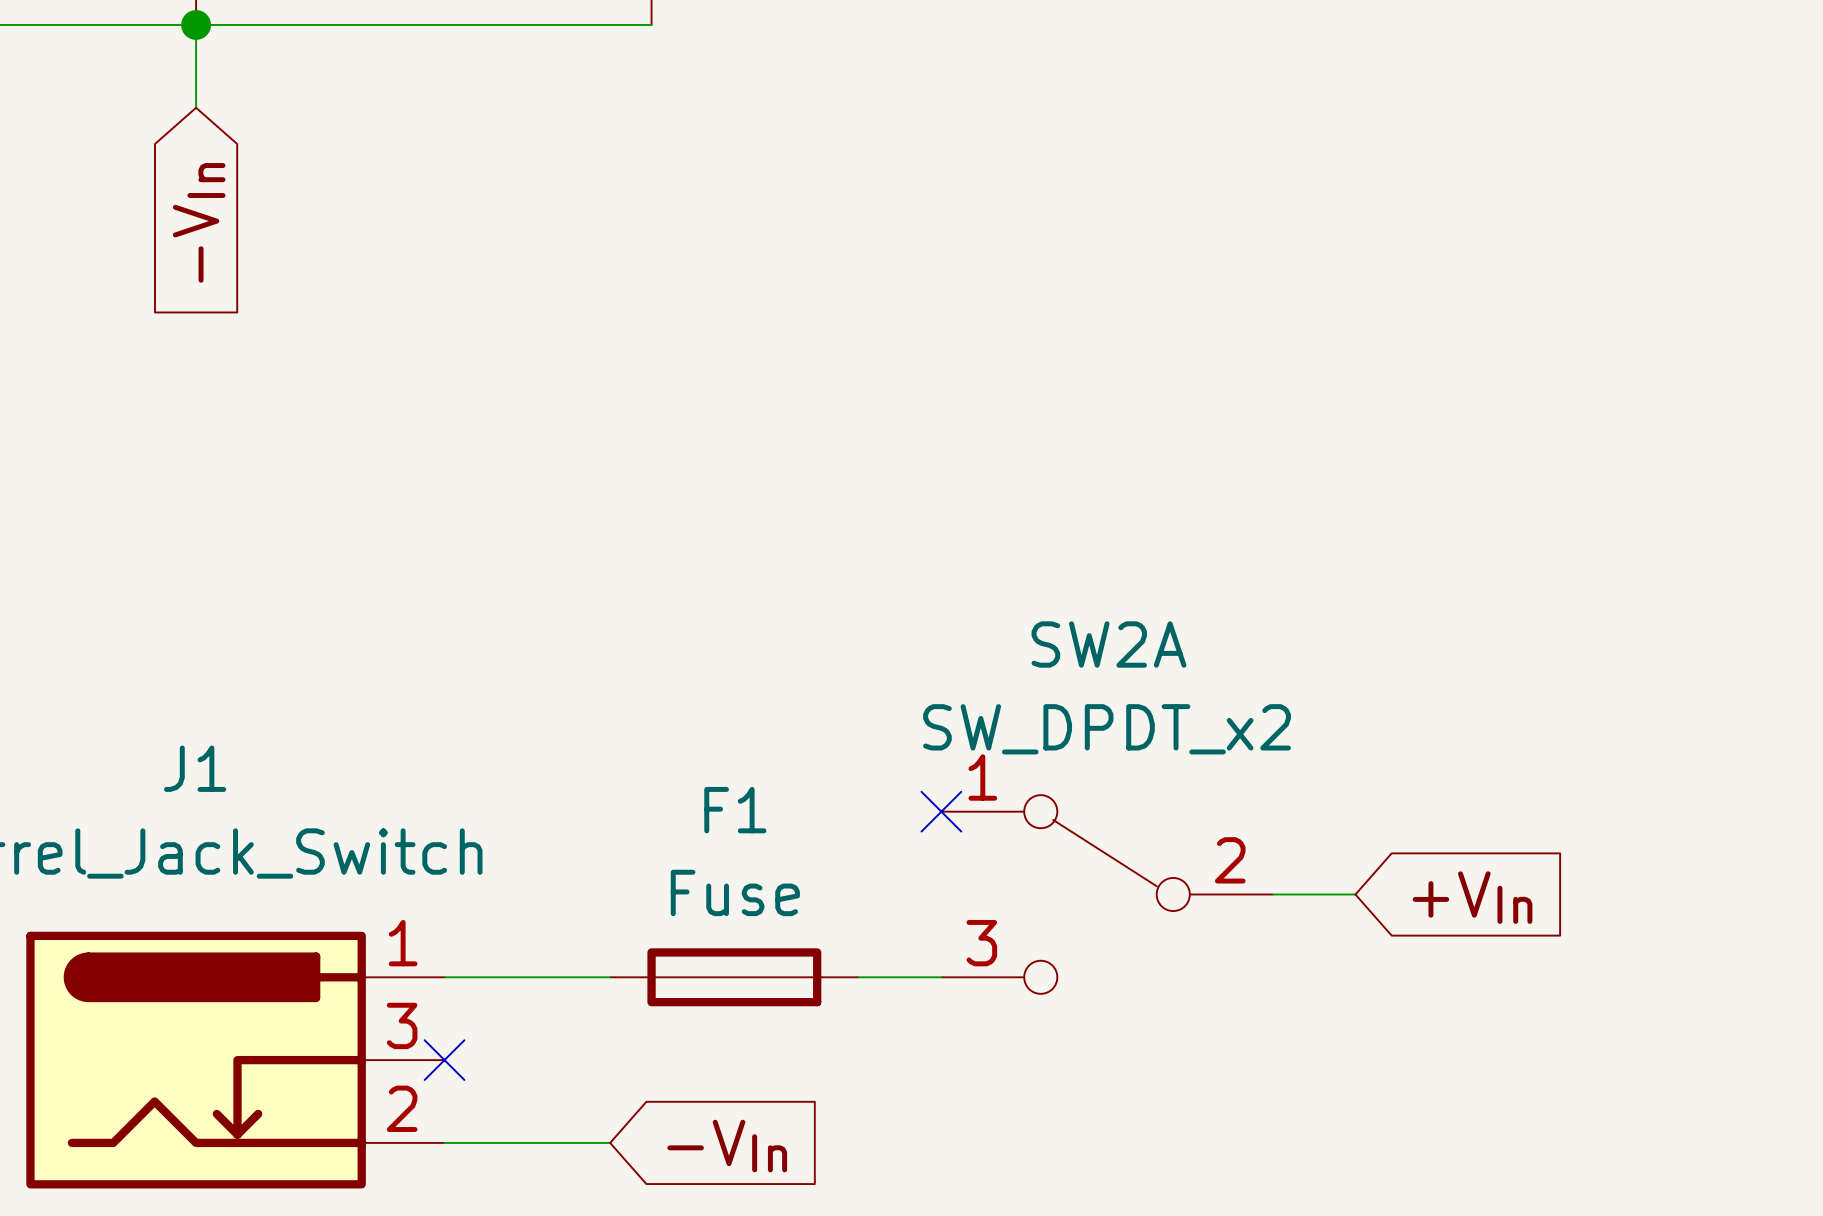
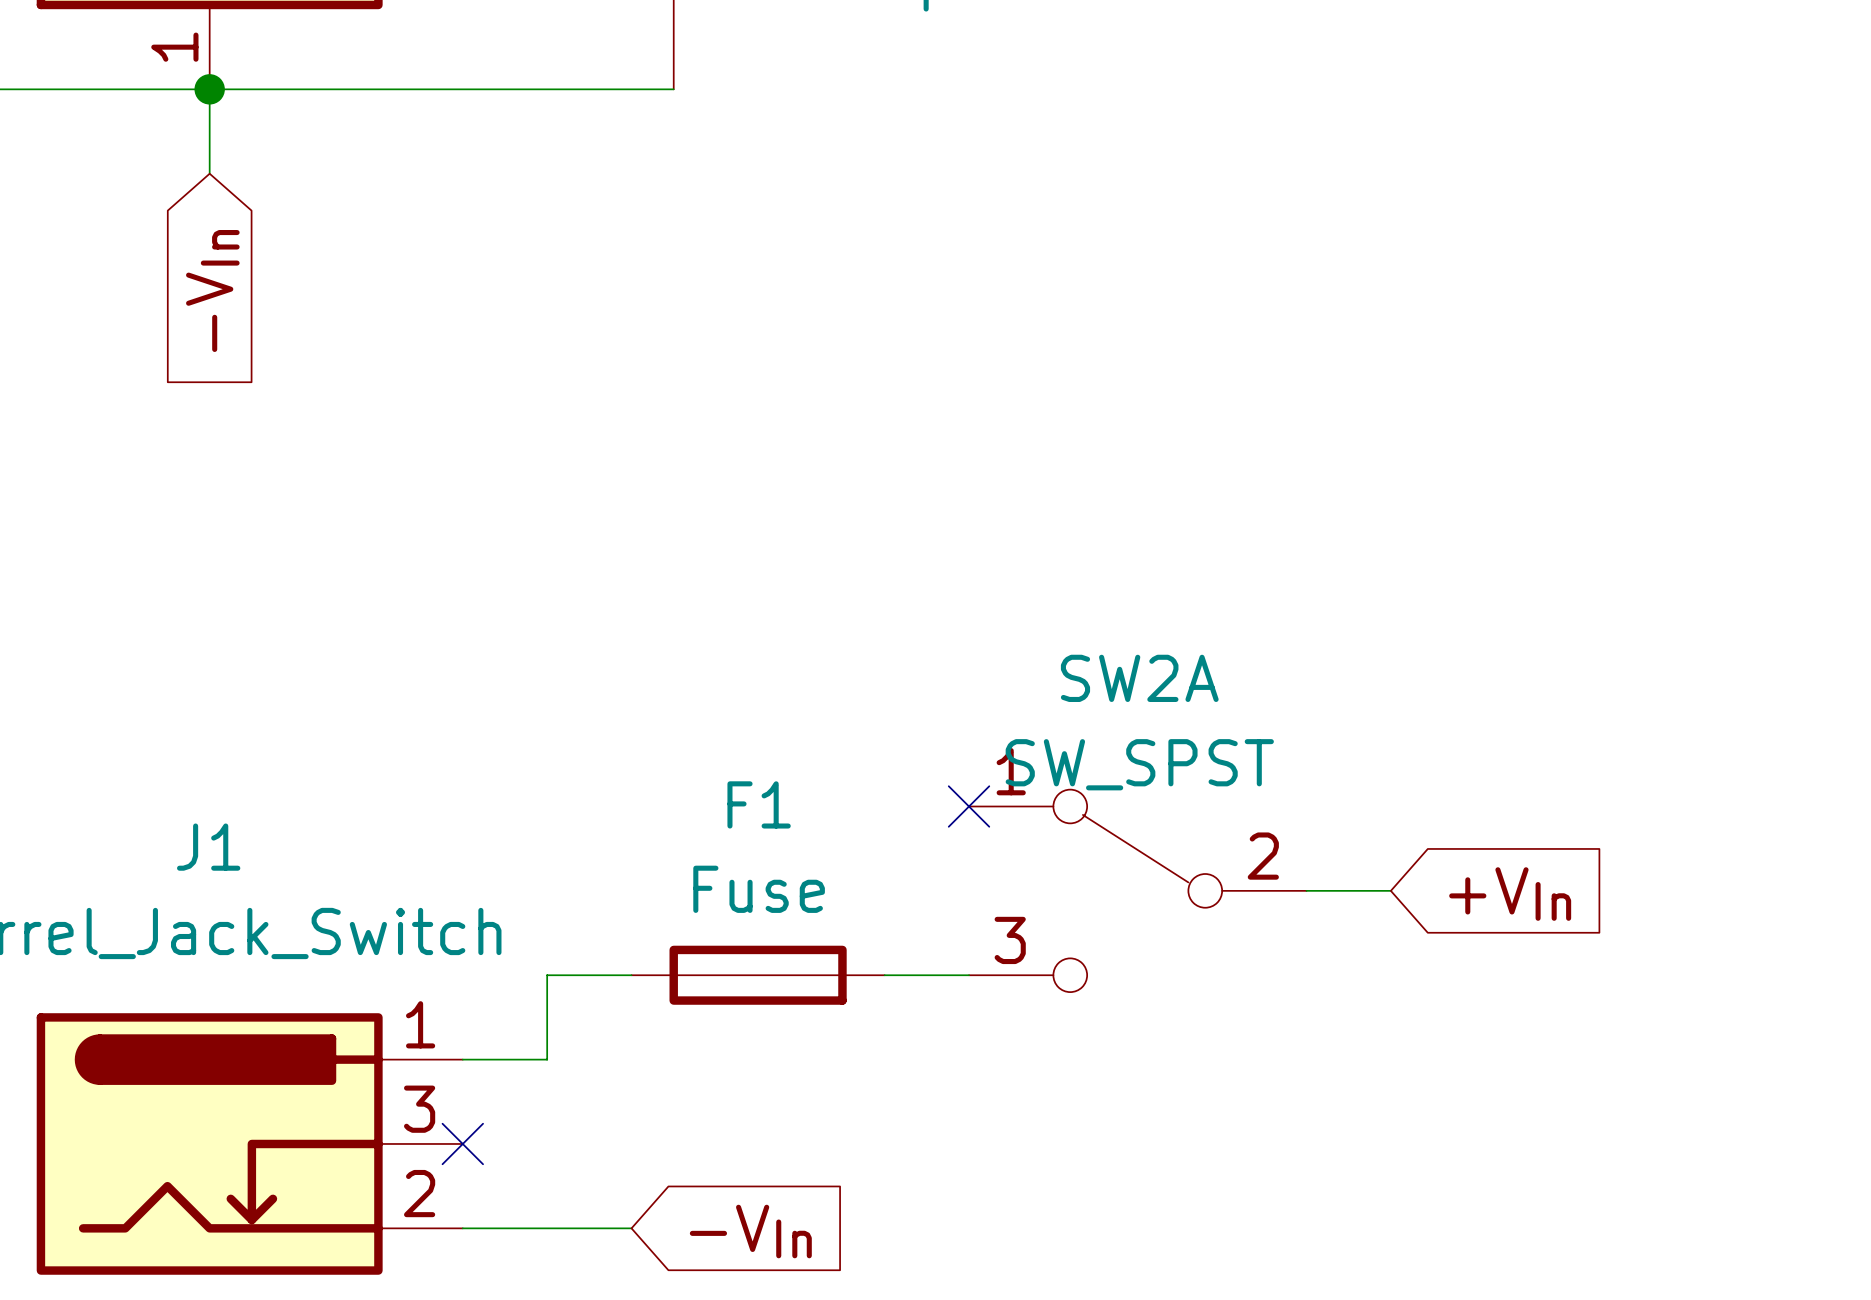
SW2A name position: SW2A (1108, 644) -> SW2A (1139, 678)
SW2A value: SW_DPDT_x2 (1107, 729) -> SW_SPST (1139, 764)
no-connect mark position: (941, 811) -> (969, 806)
SW2A position: (1107, 894) -> (1137, 890)
wire: (1272, 894) (1355, 894) -> (1306, 890) (1390, 890)
global label position: +VIn (1472, 897) -> +VIn (1510, 894)
wire: (527, 977) (610, 977) -> (547, 1059) (547, 975) (631, 975)
F1 position: (734, 977) -> (758, 975)
wire: (858, 977) (941, 977) -> (884, 975) (969, 975)

